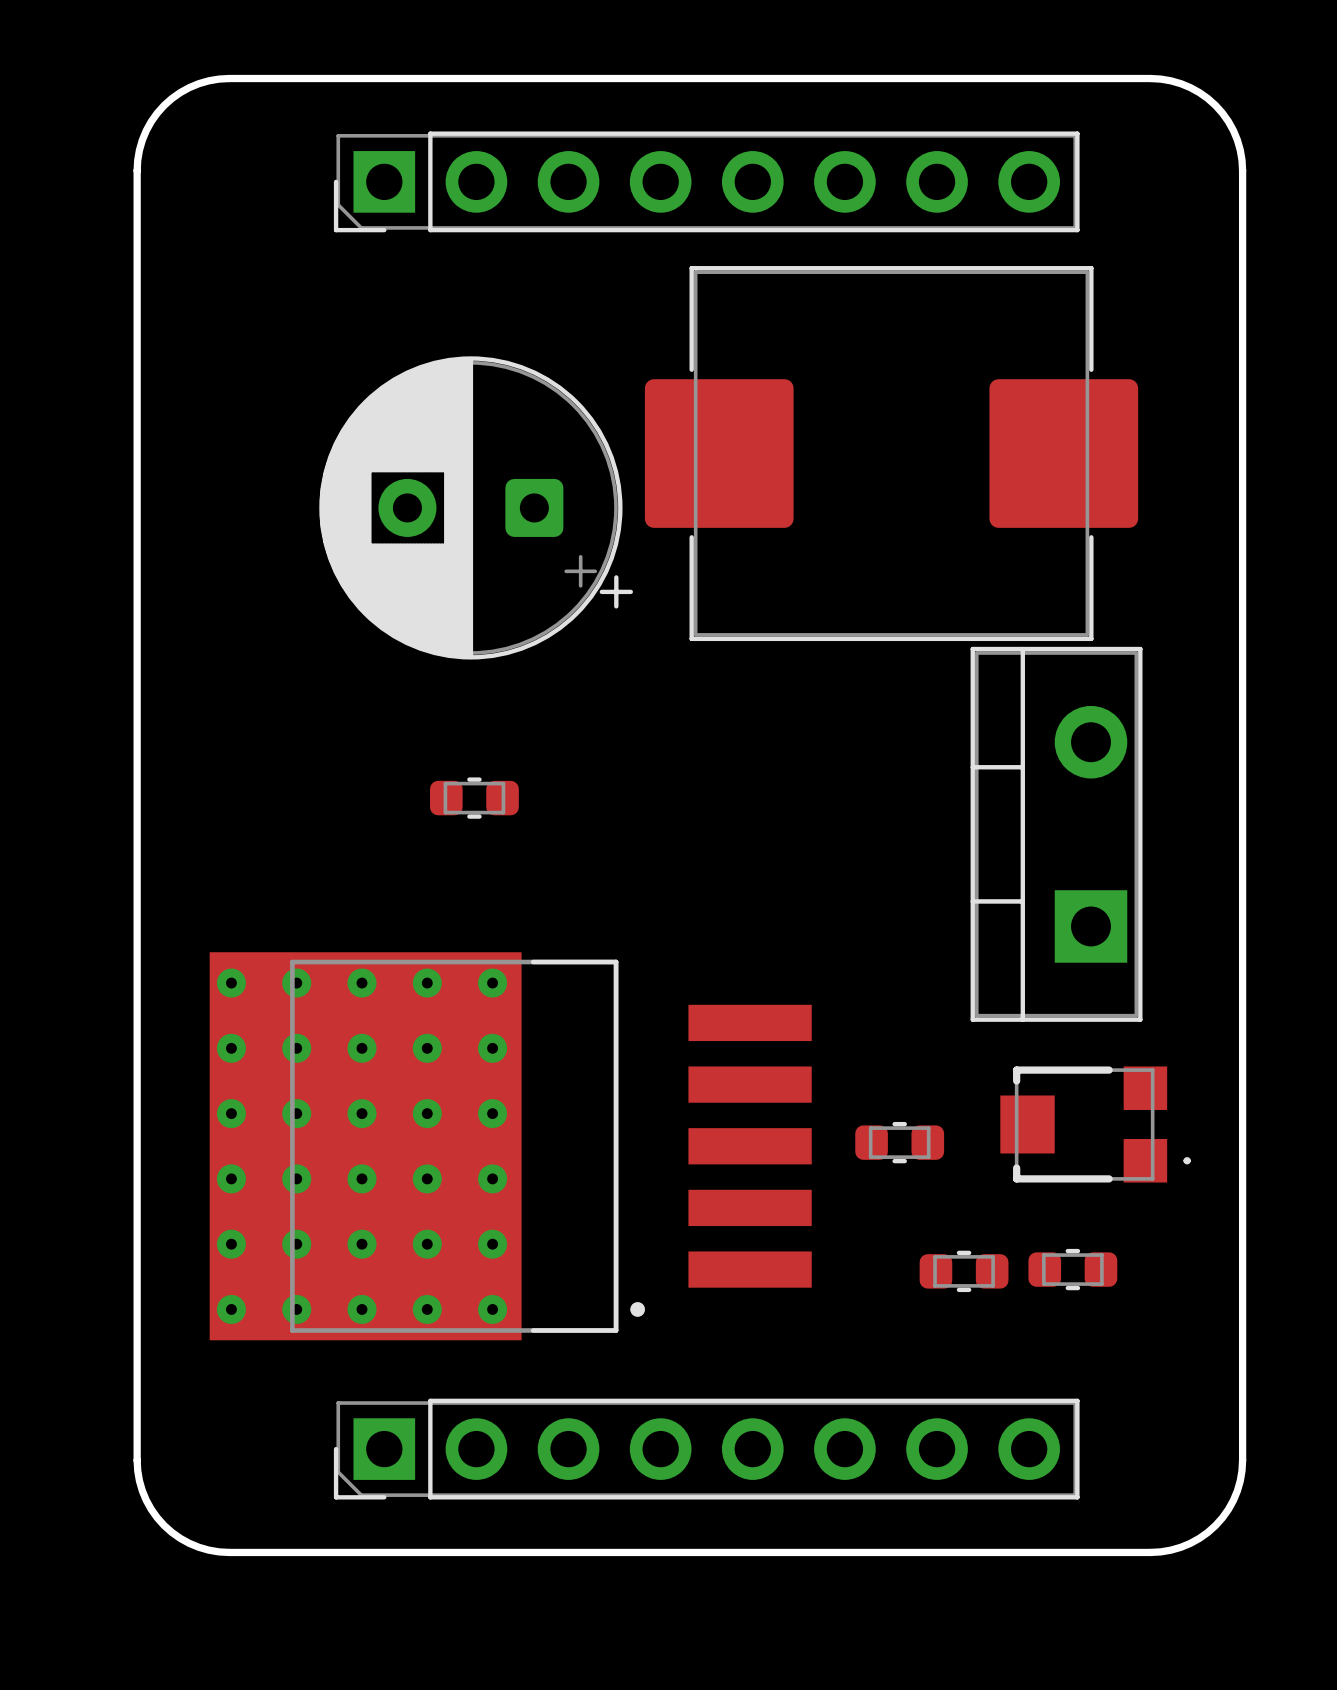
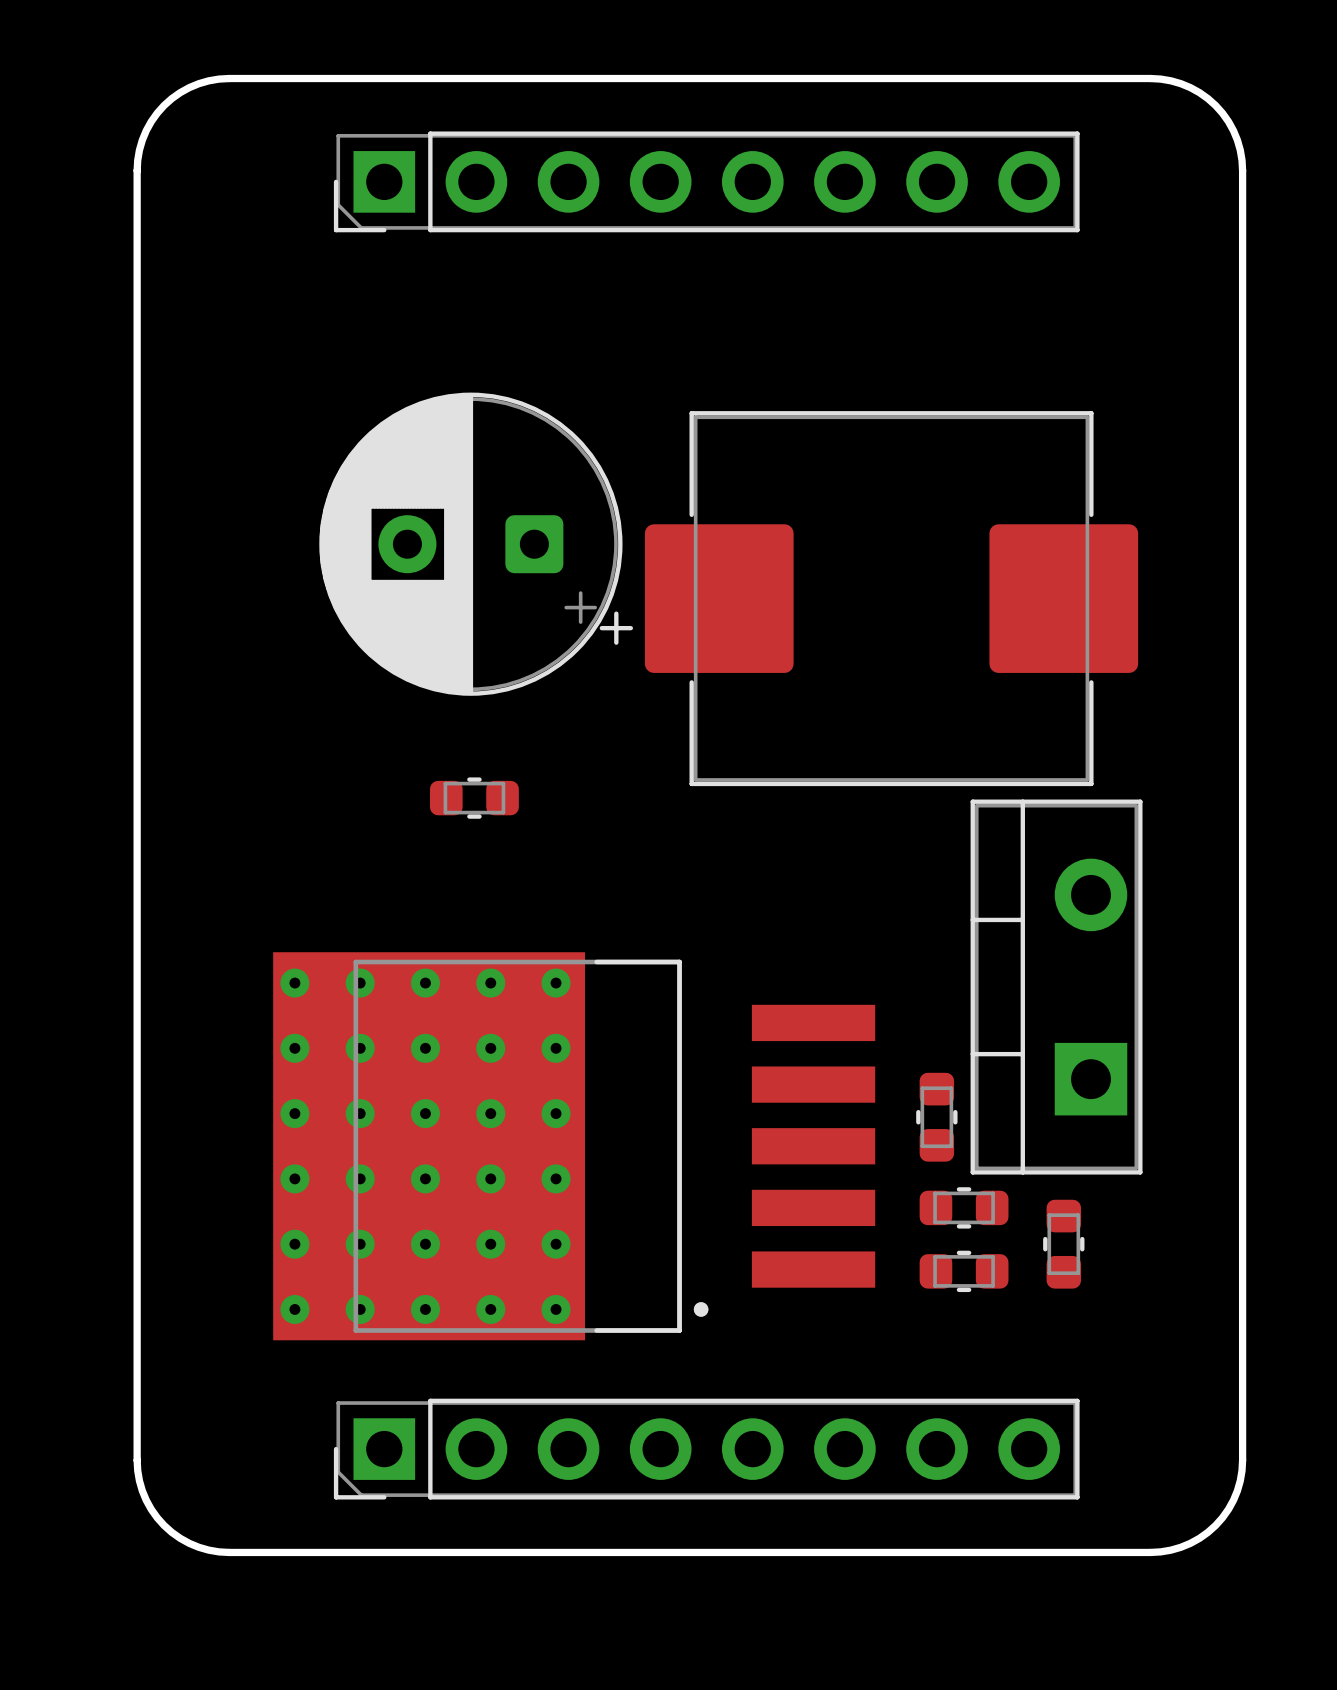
part position: (891, 453) -> (891, 598)
part position: (476, 507) -> (476, 544)
part position: (1056, 834) -> (1056, 987)
part: (1095, 1124) -> none
part rotation: 0° (899, 1142) -> 90° clockwise (936, 1117)
part position: (510, 1146) -> (574, 1146)
part: none -> (964, 1207)
part rotation: 0° (1072, 1269) -> 90° clockwise (1063, 1244)

